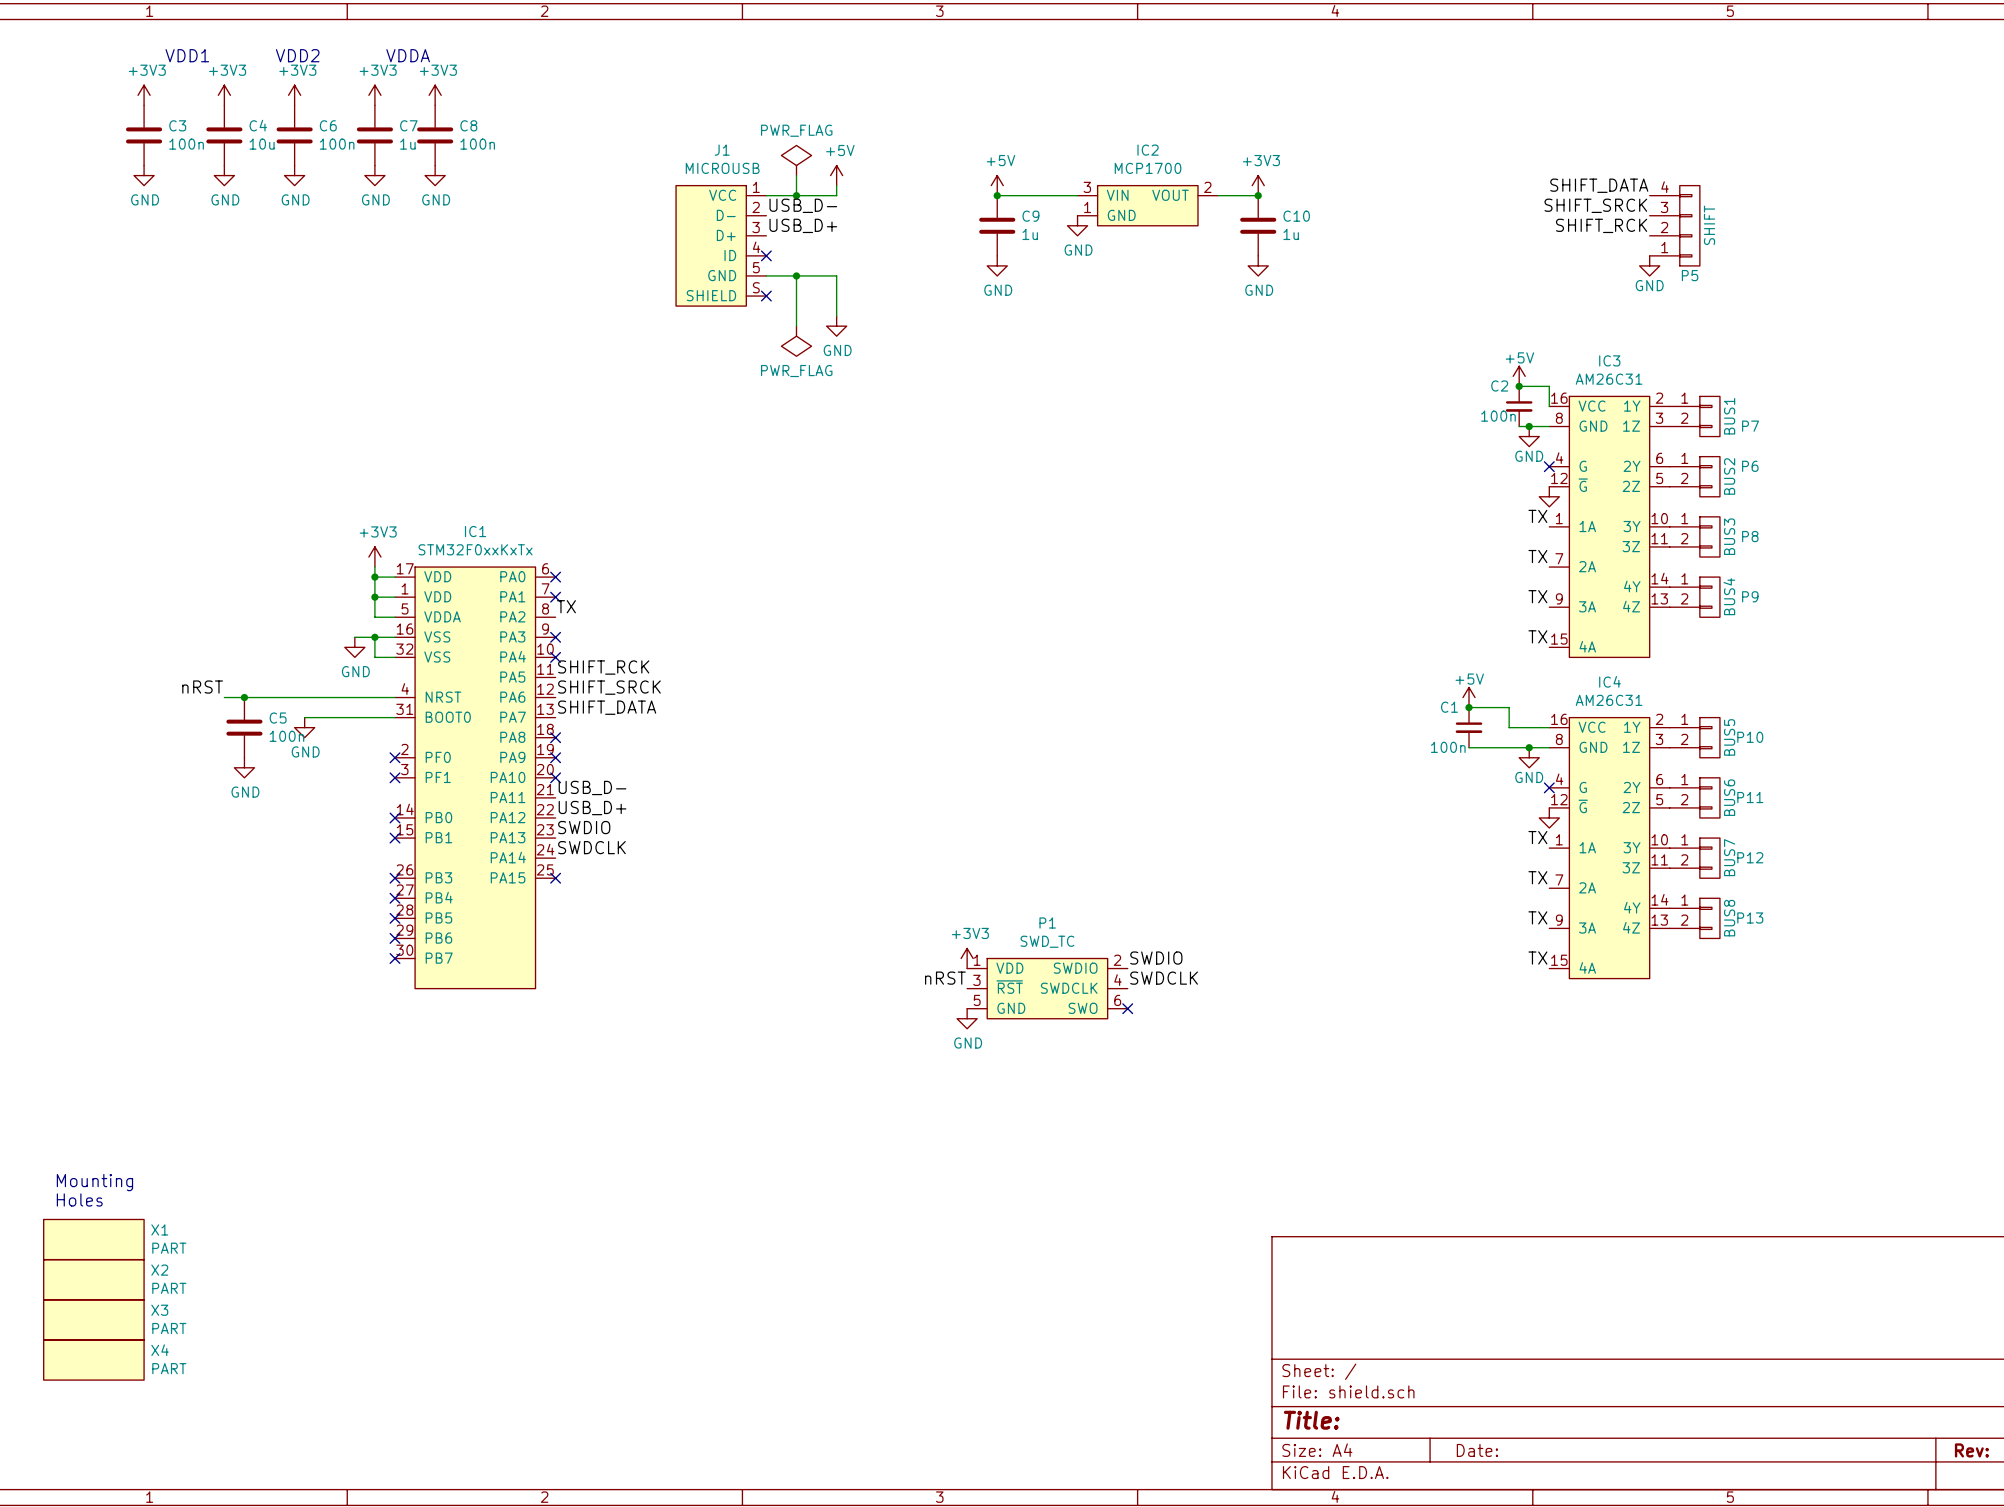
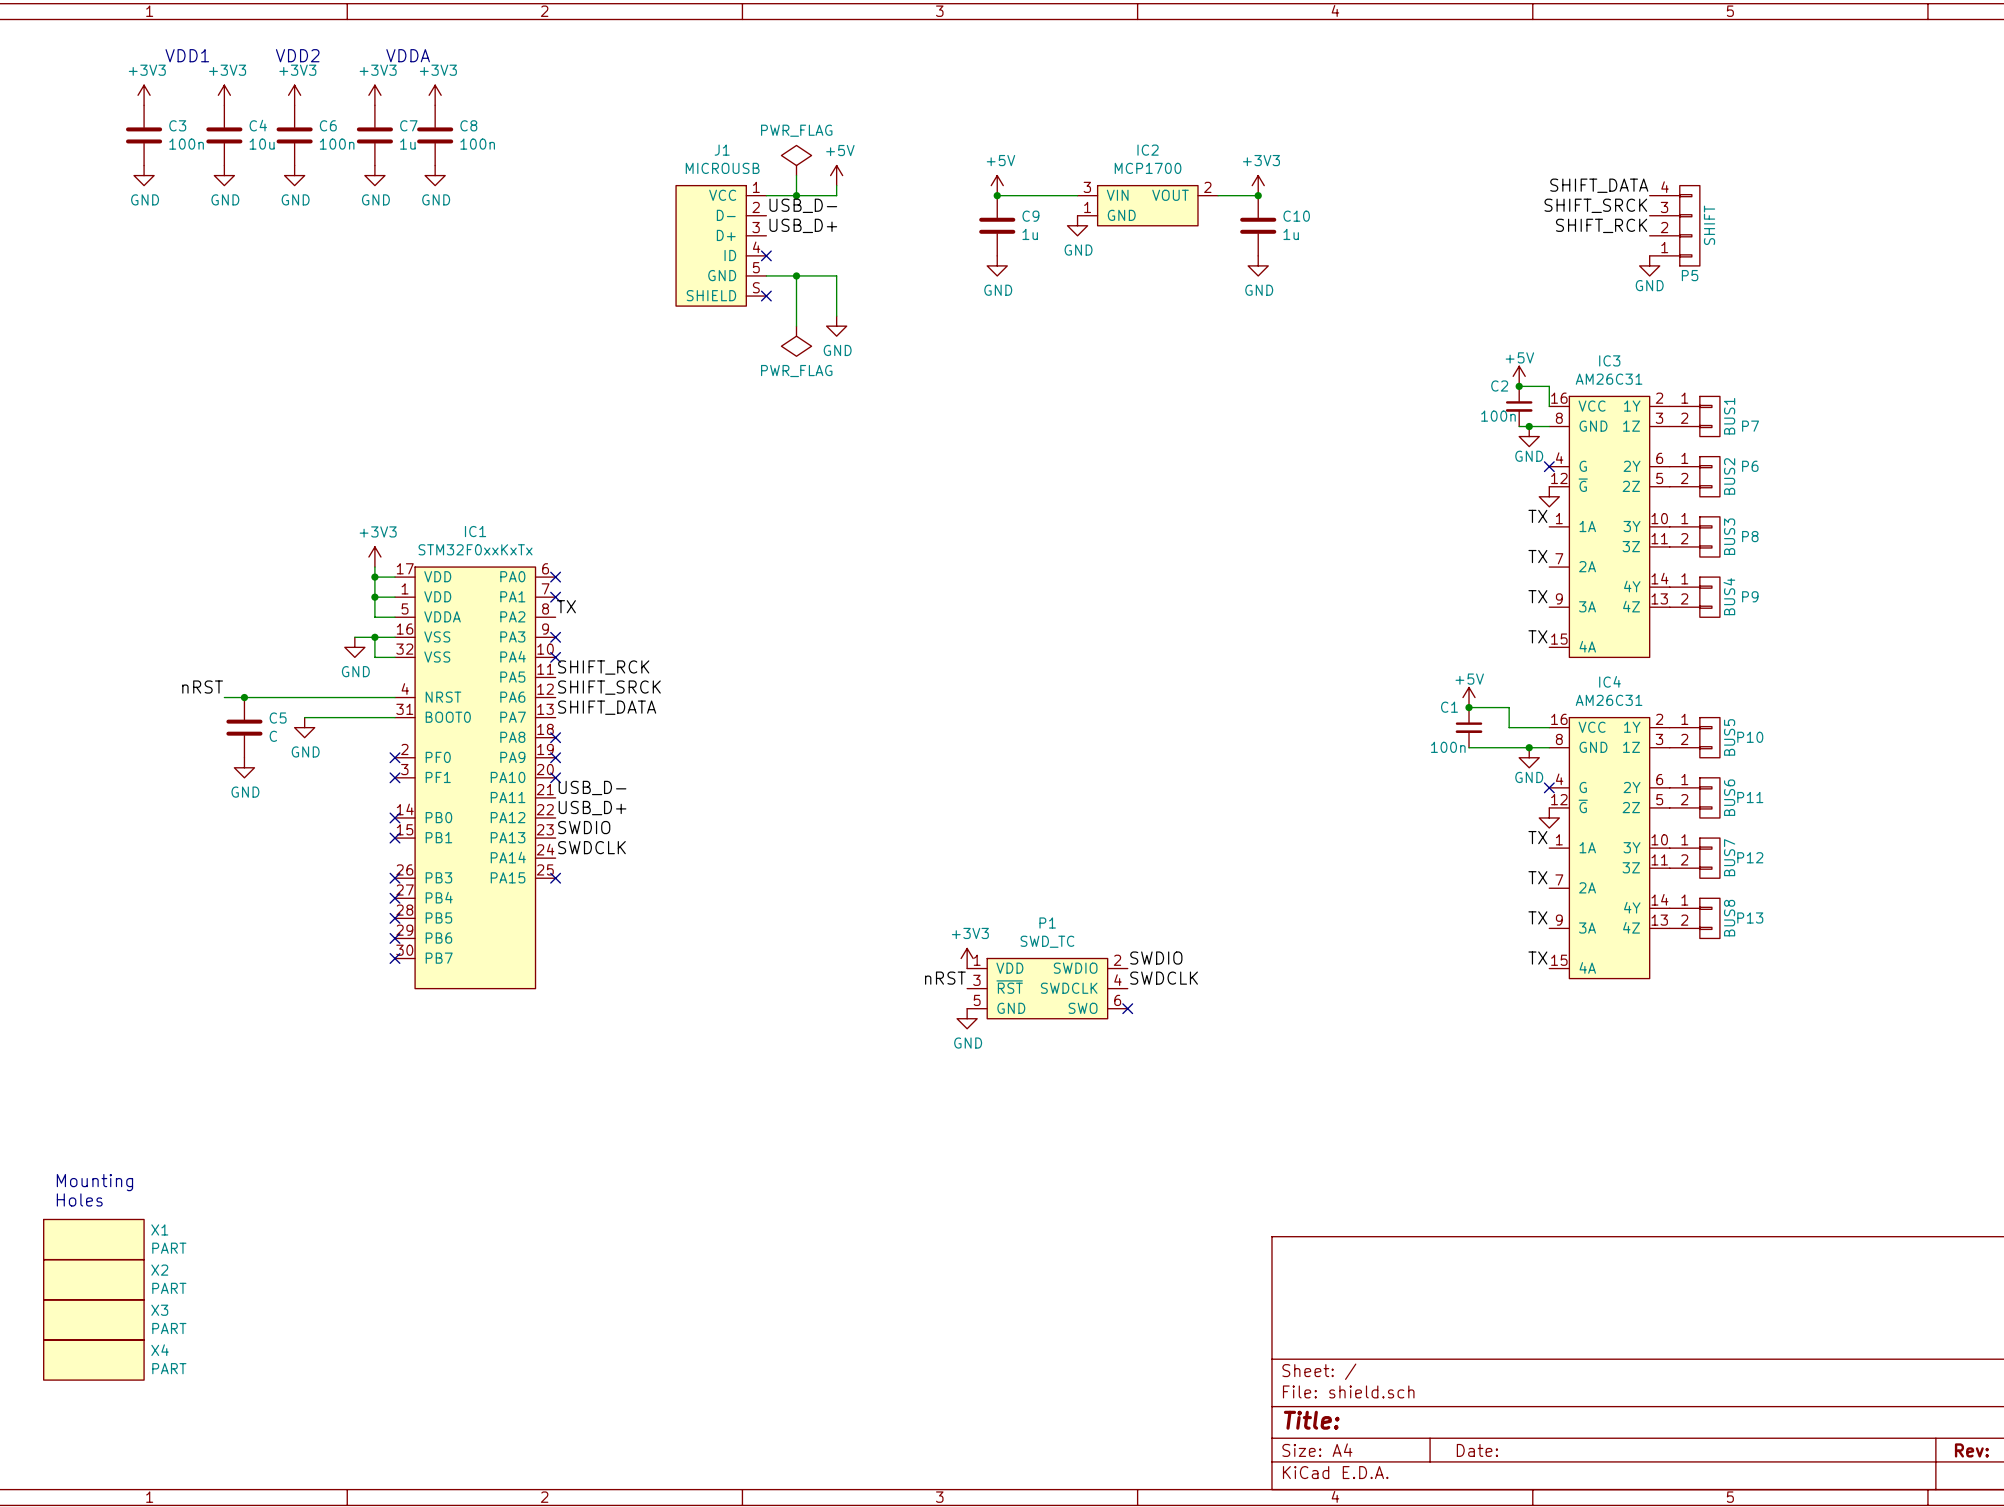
C5 value: 100n (286, 736) -> C (273, 736)

